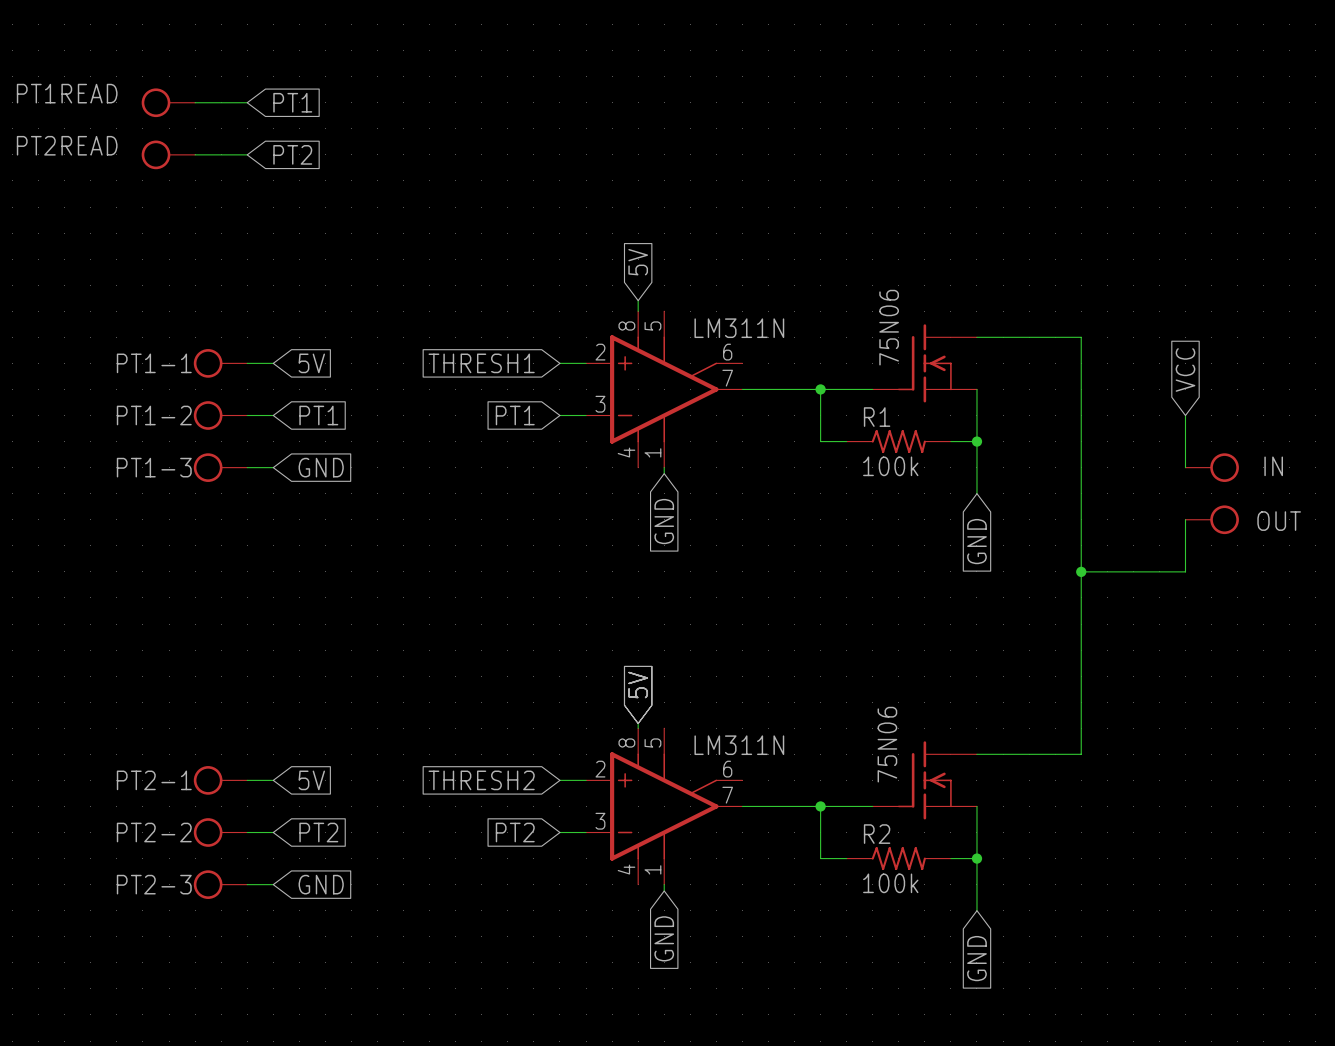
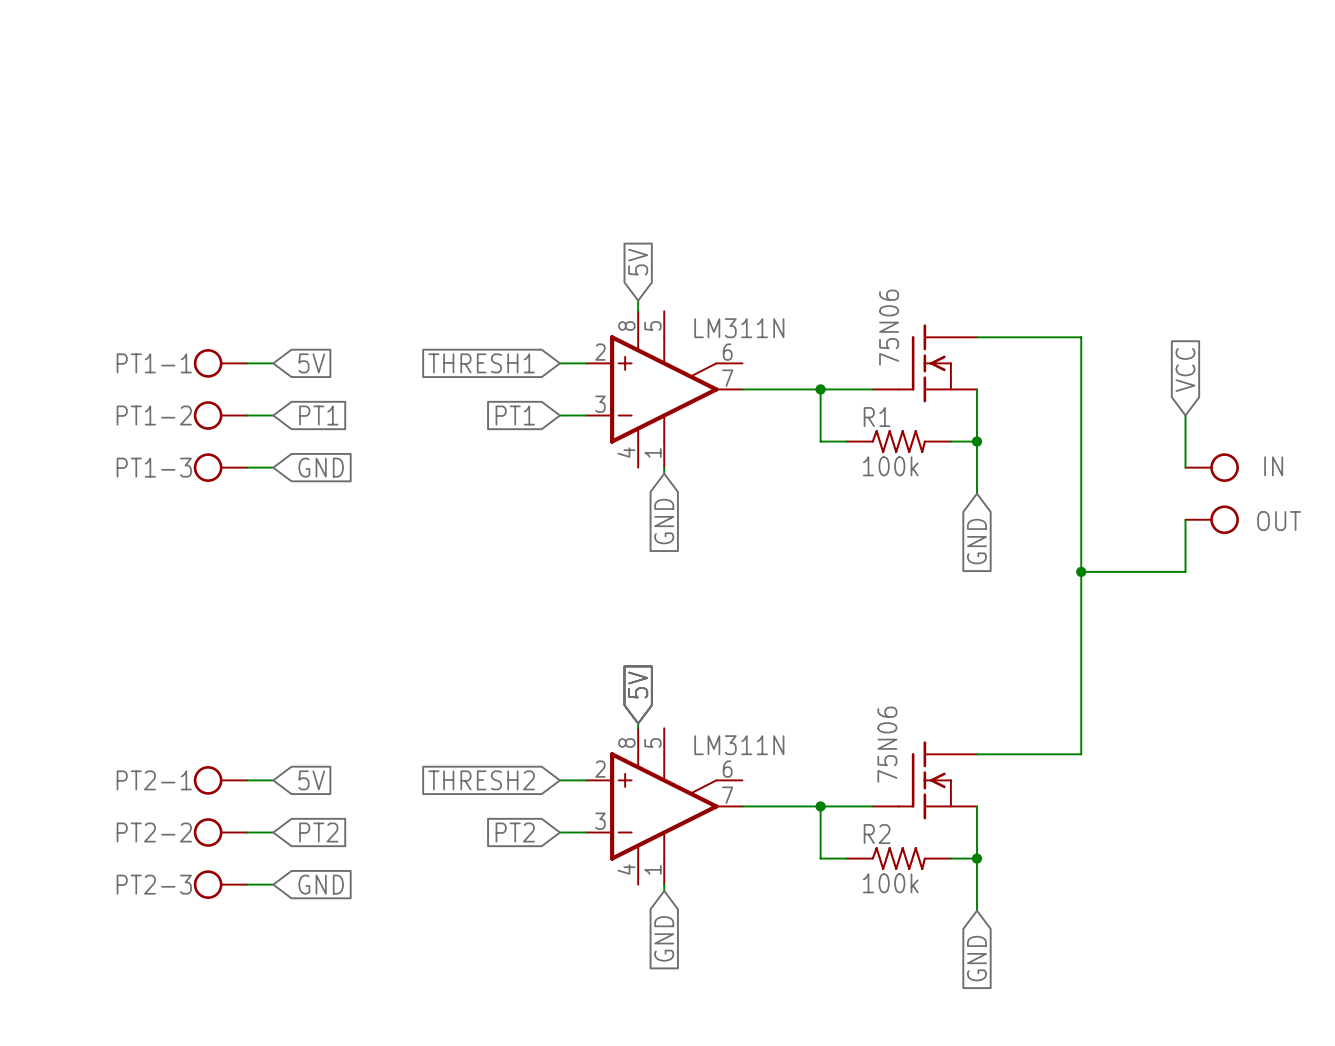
part: (168, 102) -> none
wire: (195, 102) (247, 102) -> none
global label: PT1 (292, 102) -> none
part: (168, 154) -> none
wire: (195, 154) (247, 154) -> none
global label: PT2 (292, 154) -> none

